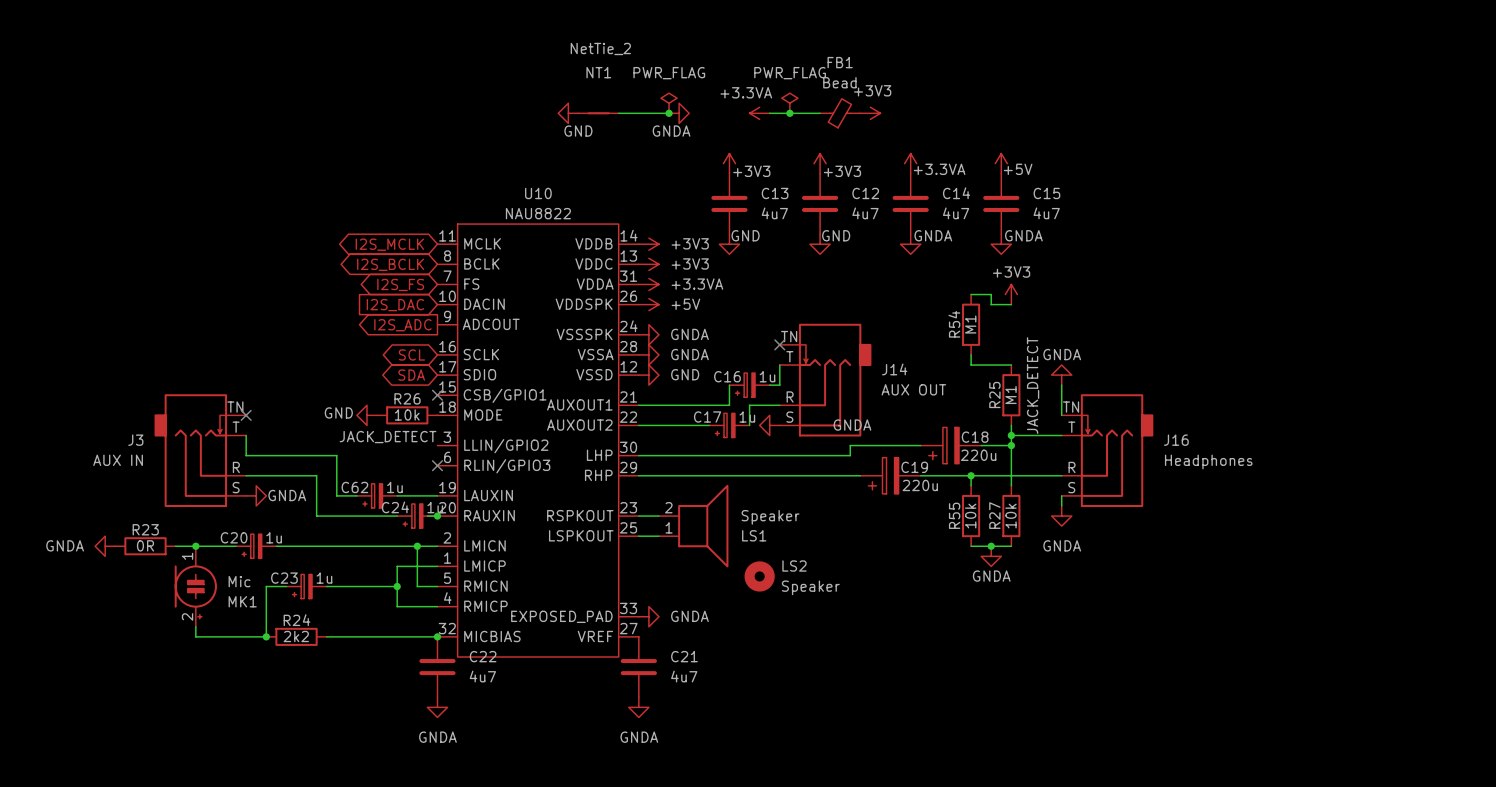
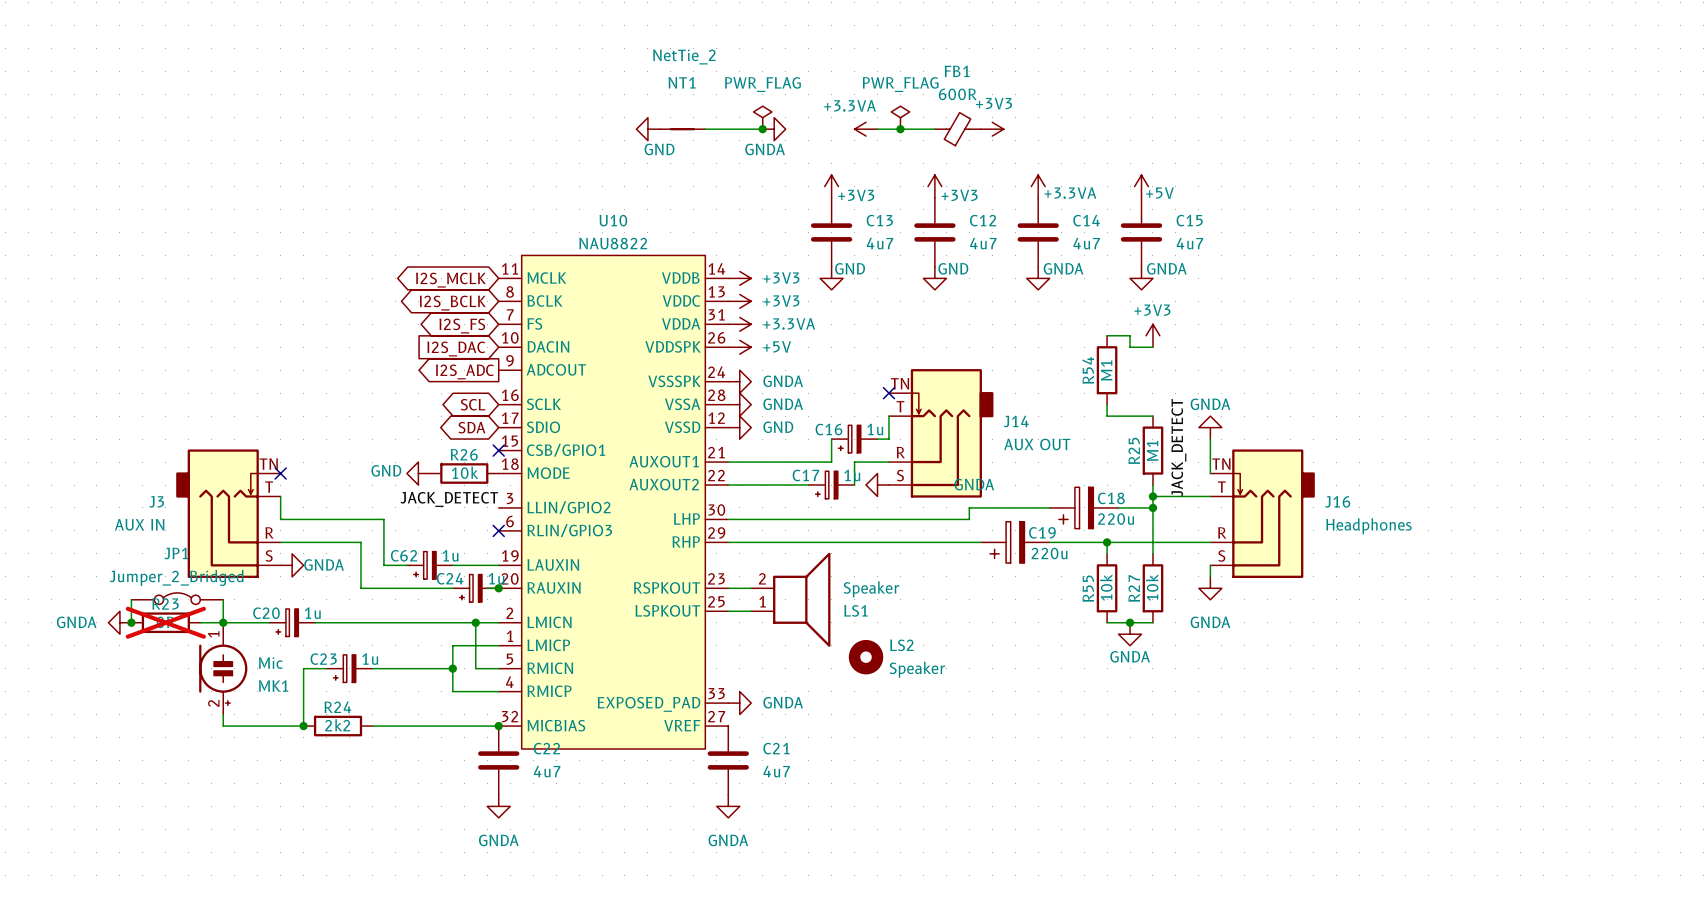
FB1 value: Bead (839, 82) -> 600R (957, 94)
JP1: none -> Jumper_2_Bridged (177, 598)
wire: none -> (131, 599) (131, 622)
wire: none -> (223, 599) (223, 622)
junction: none -> (131, 622)
R23 do-not-place cross: none -> (165, 622)

